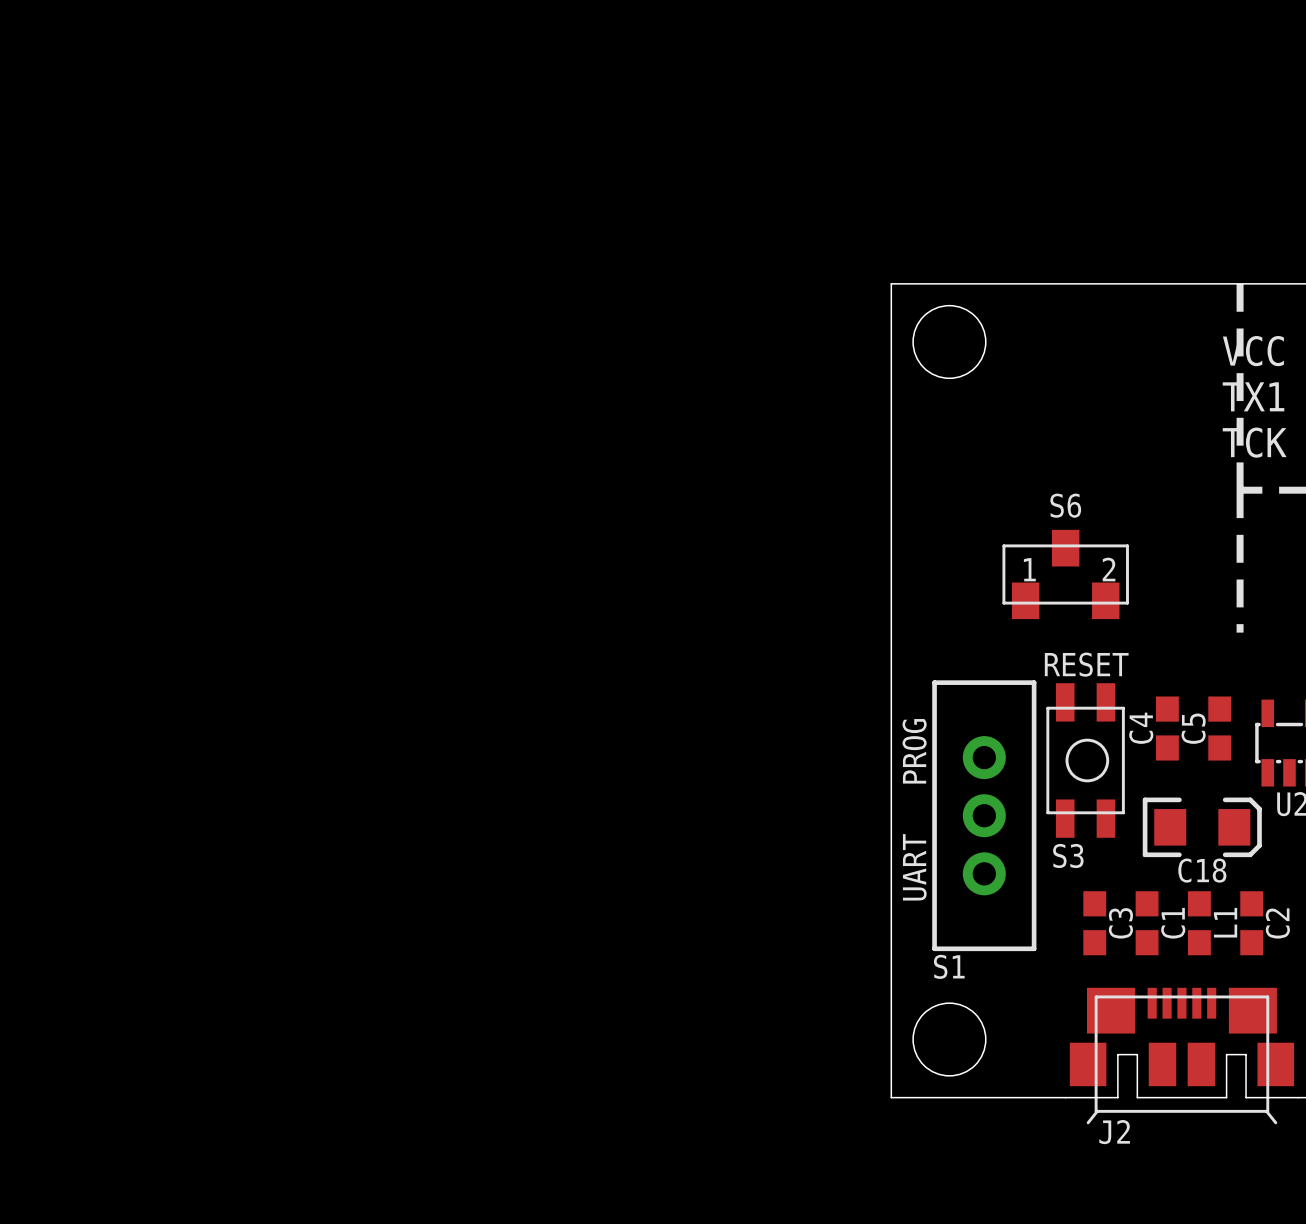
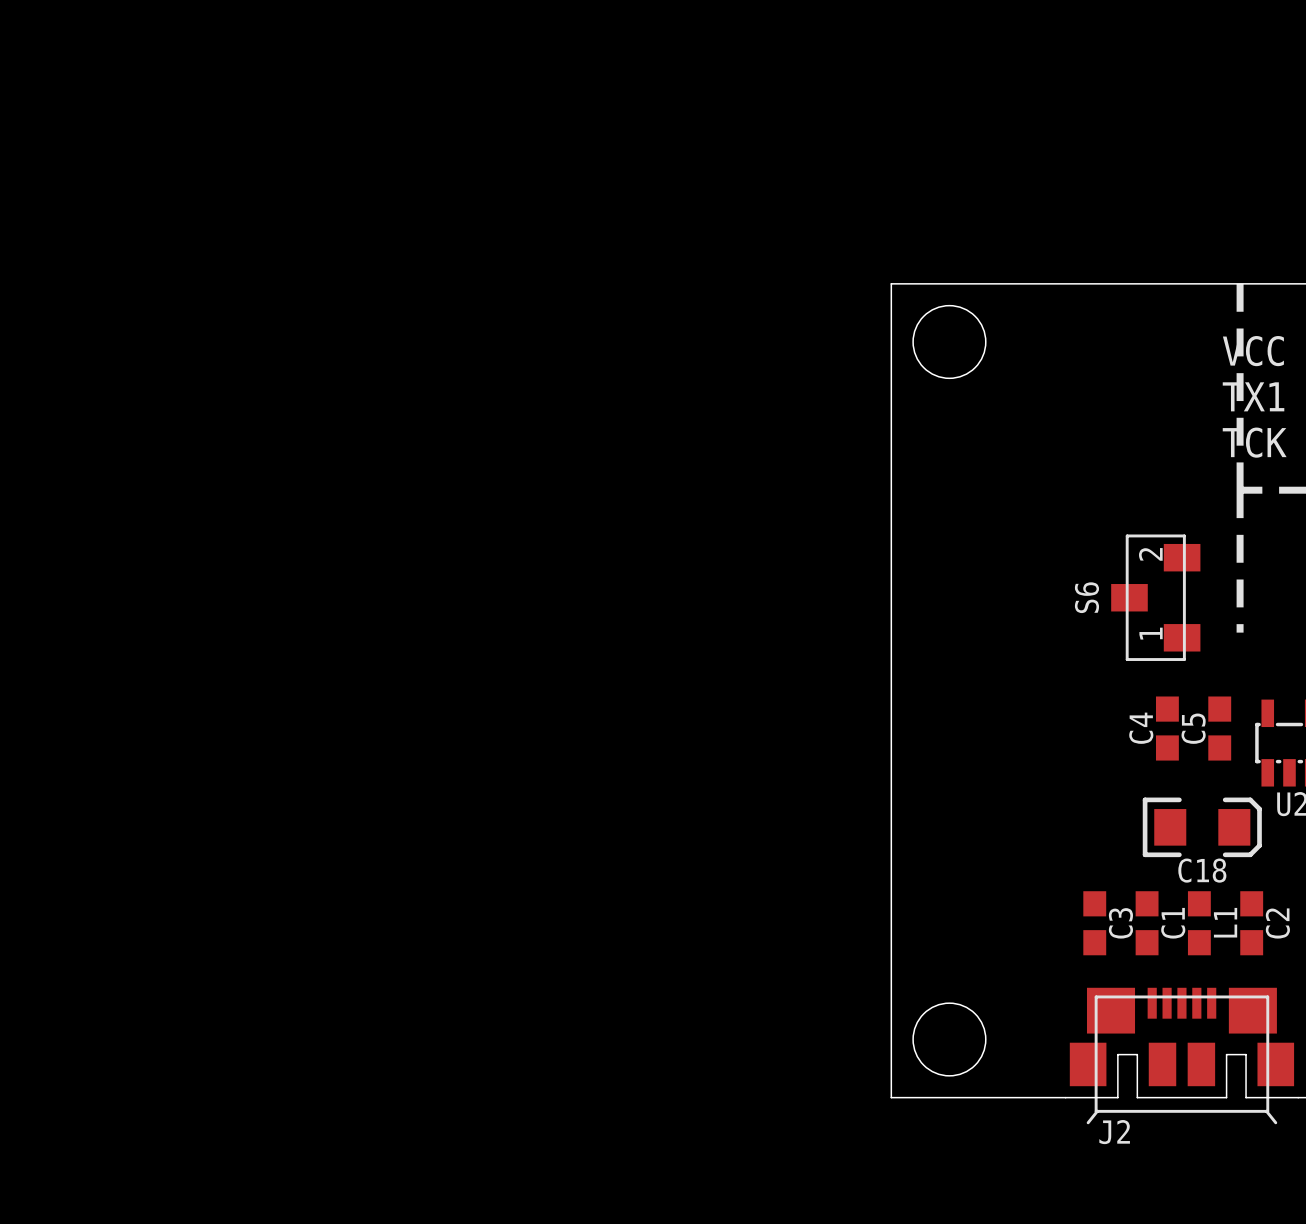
S6 rotation: 0° (1065, 574) -> 90° counterclockwise (1155, 597)
S6 position: (1065, 574) -> (1155, 597)
text: RESET (1086, 664) -> none
text: PROG (914, 751) -> none
S3: (1085, 760) -> none
S1: (984, 815) -> none
text: UART (914, 867) -> none

